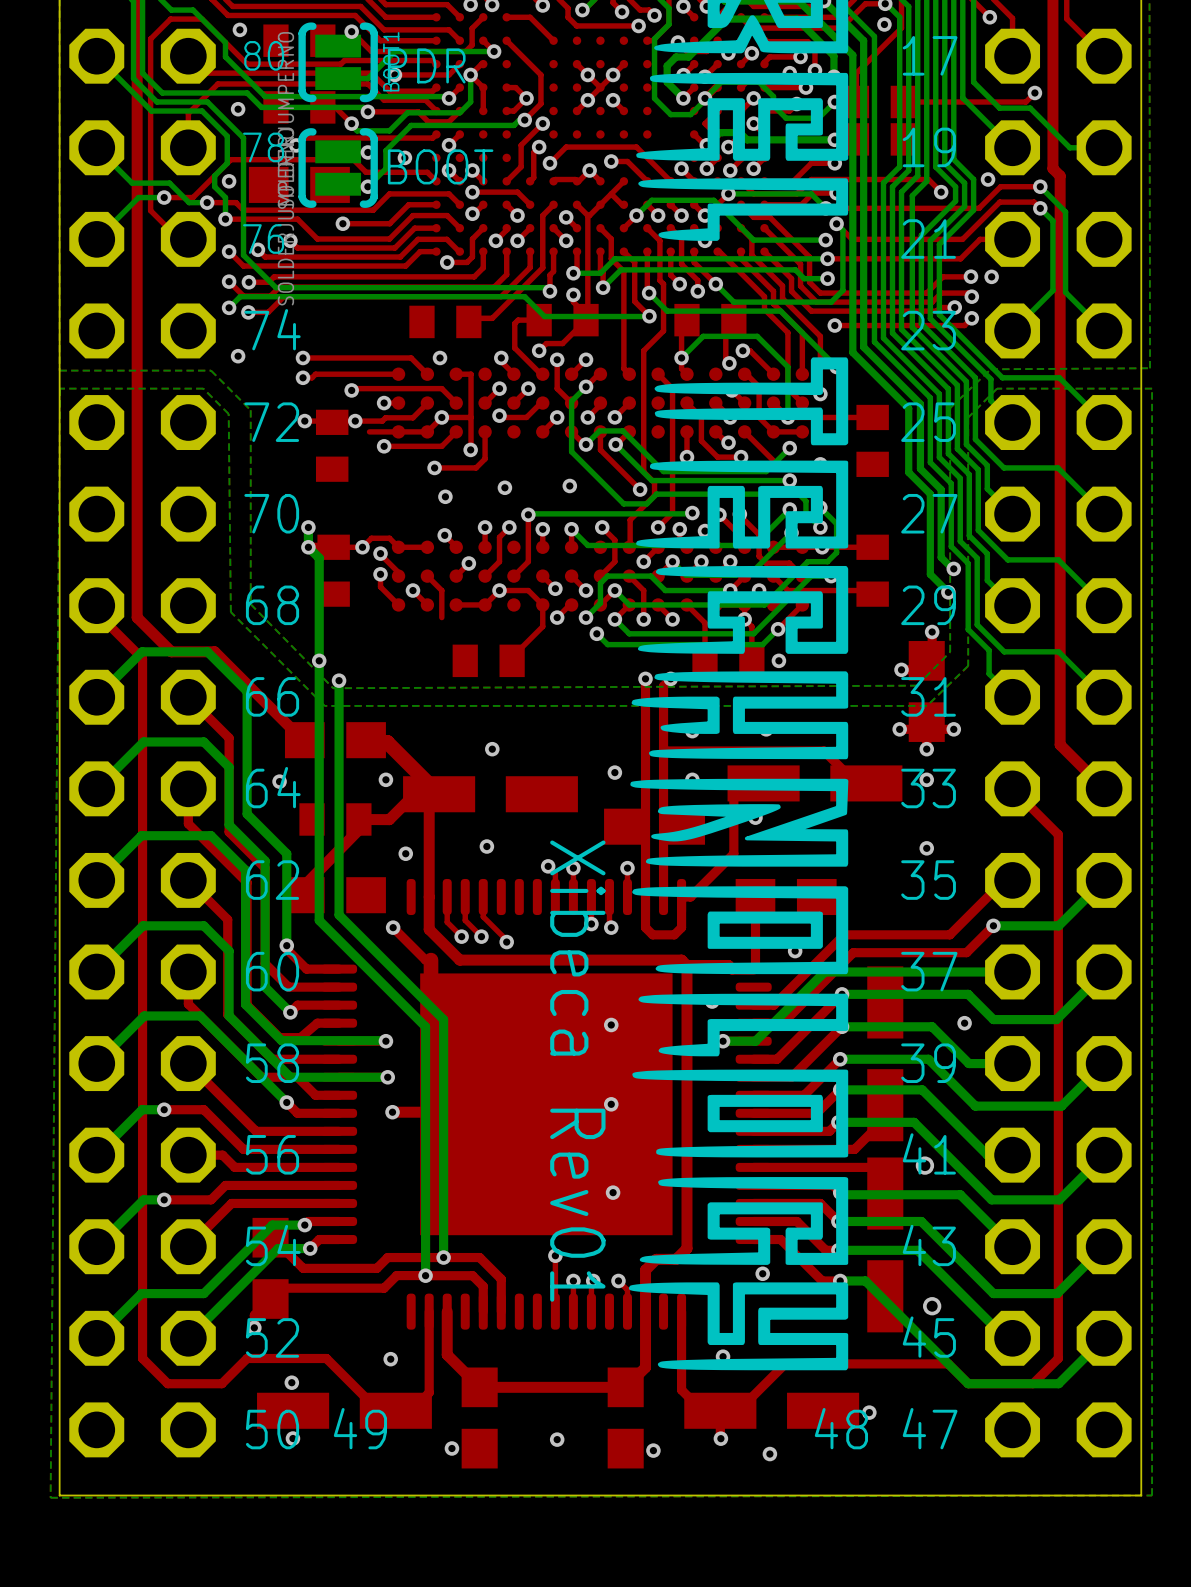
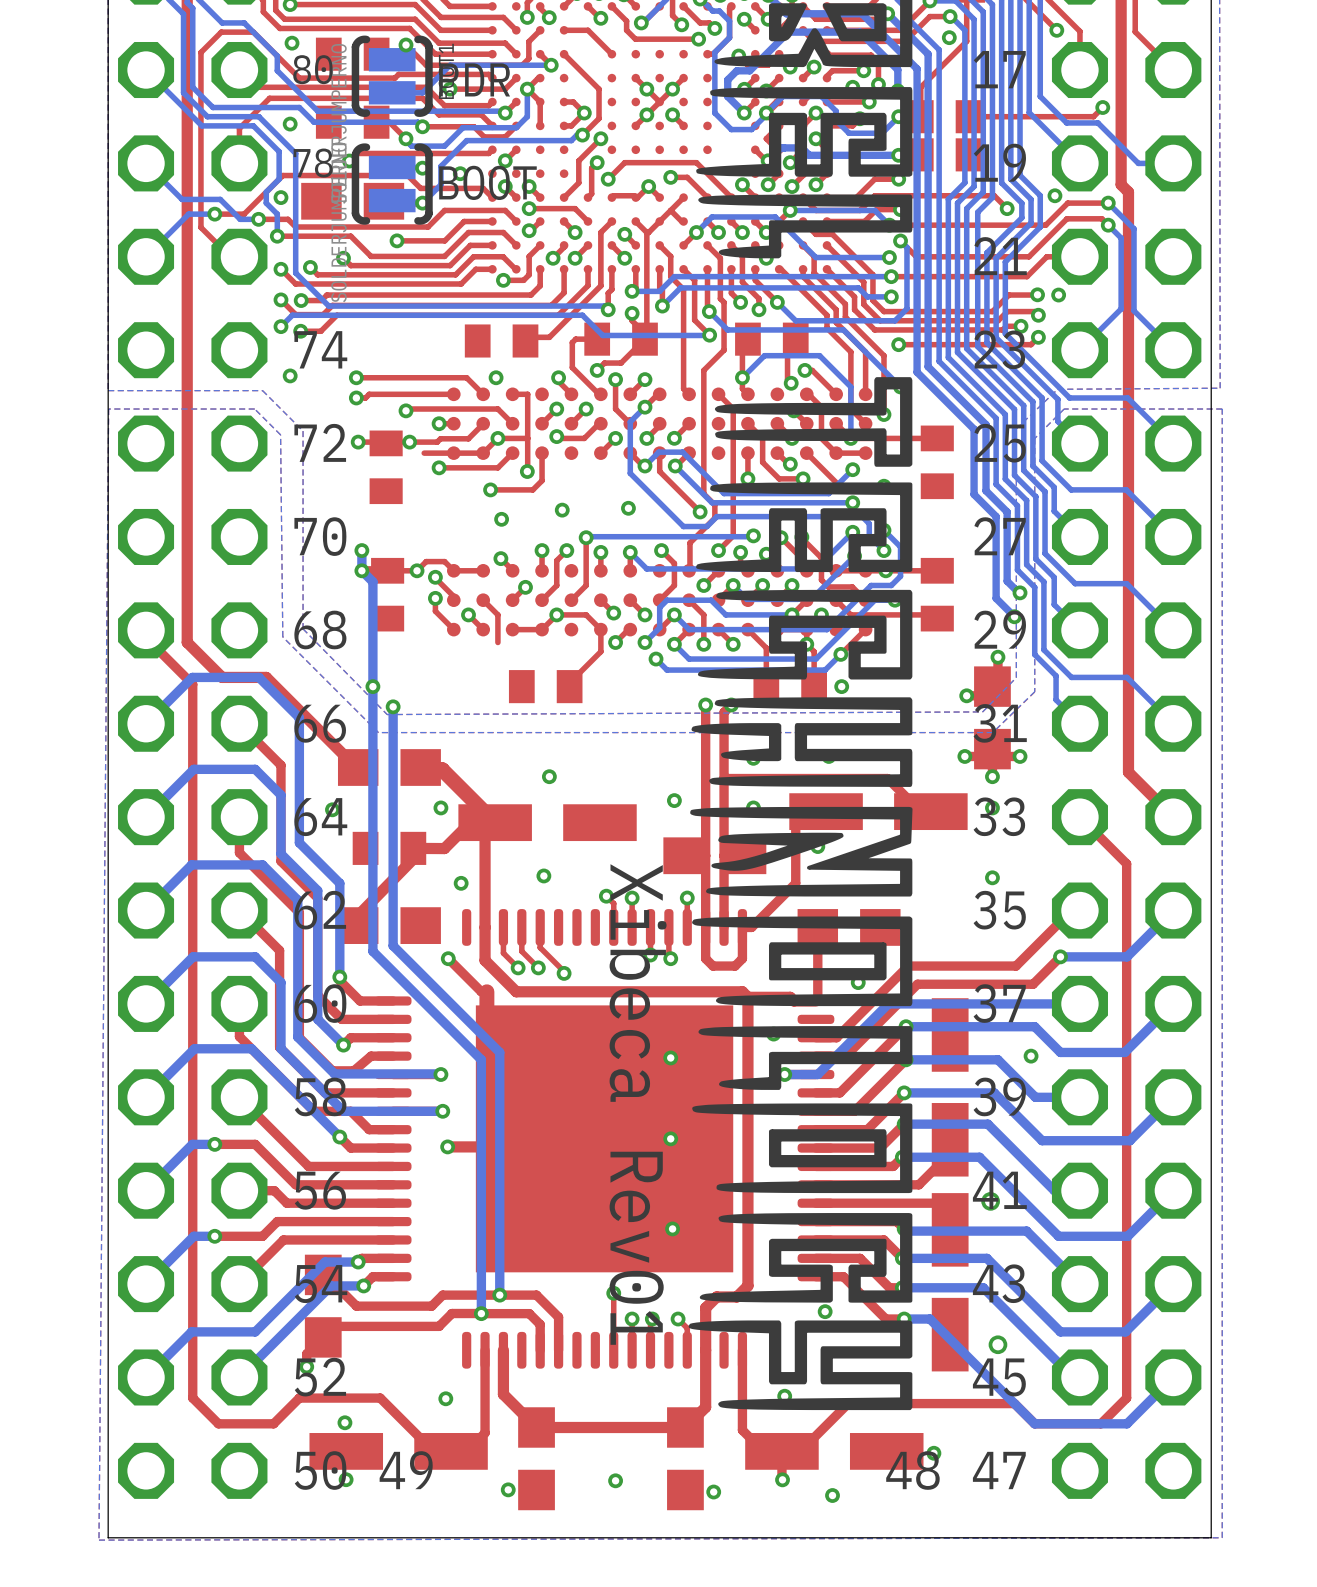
text: 76 (263, 239) -> none

